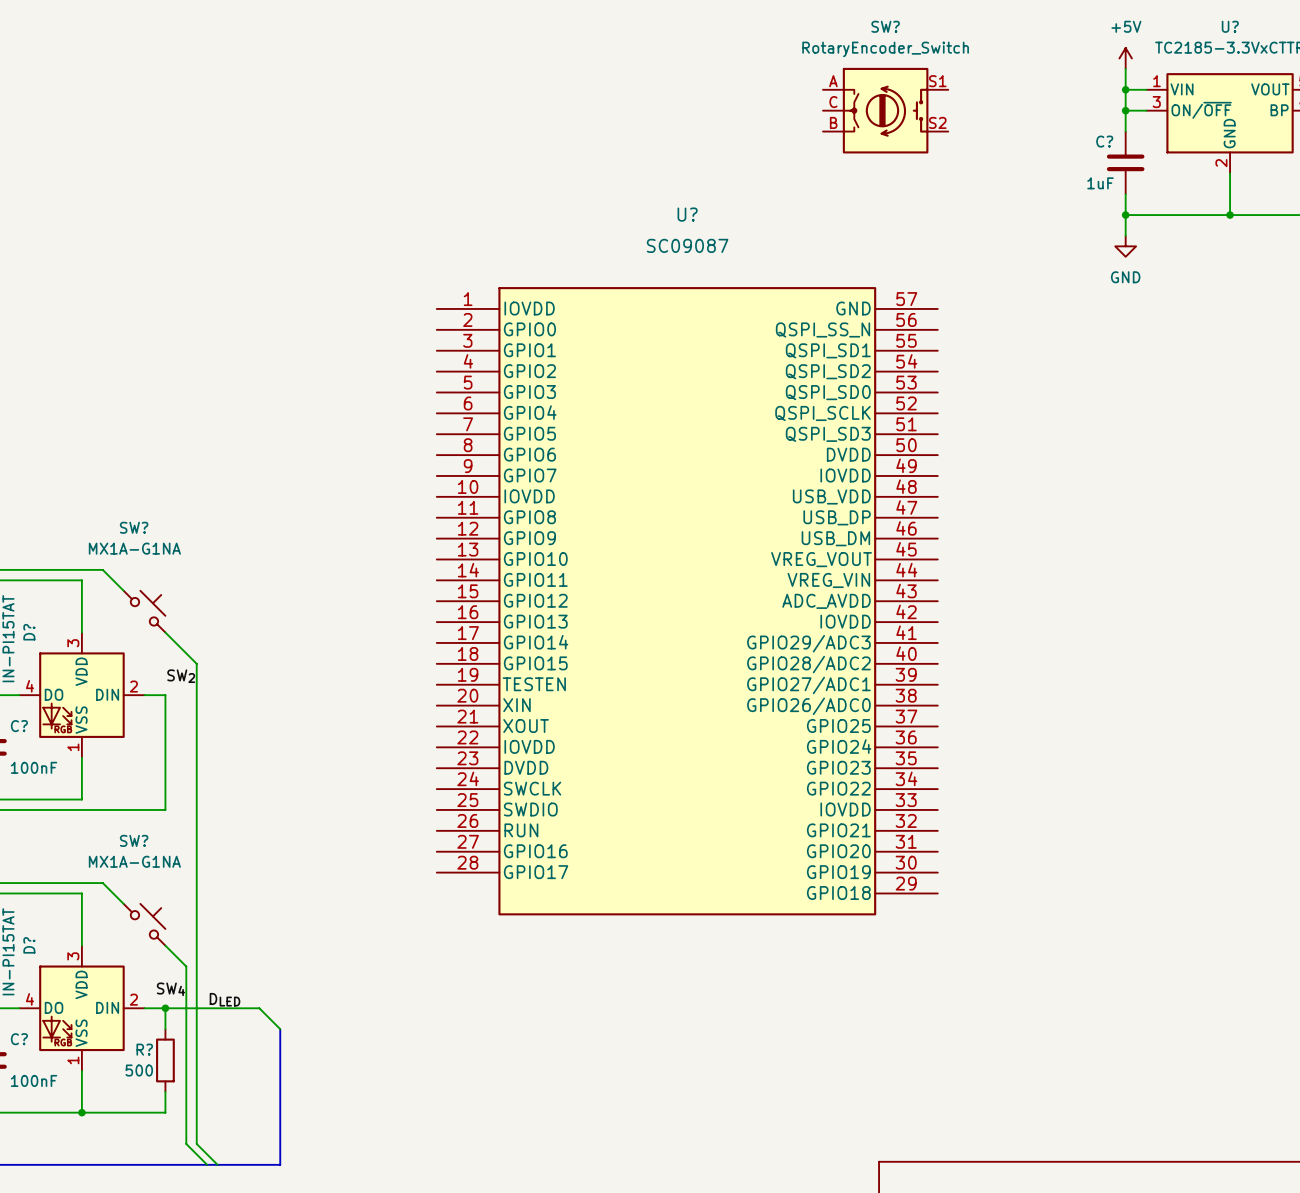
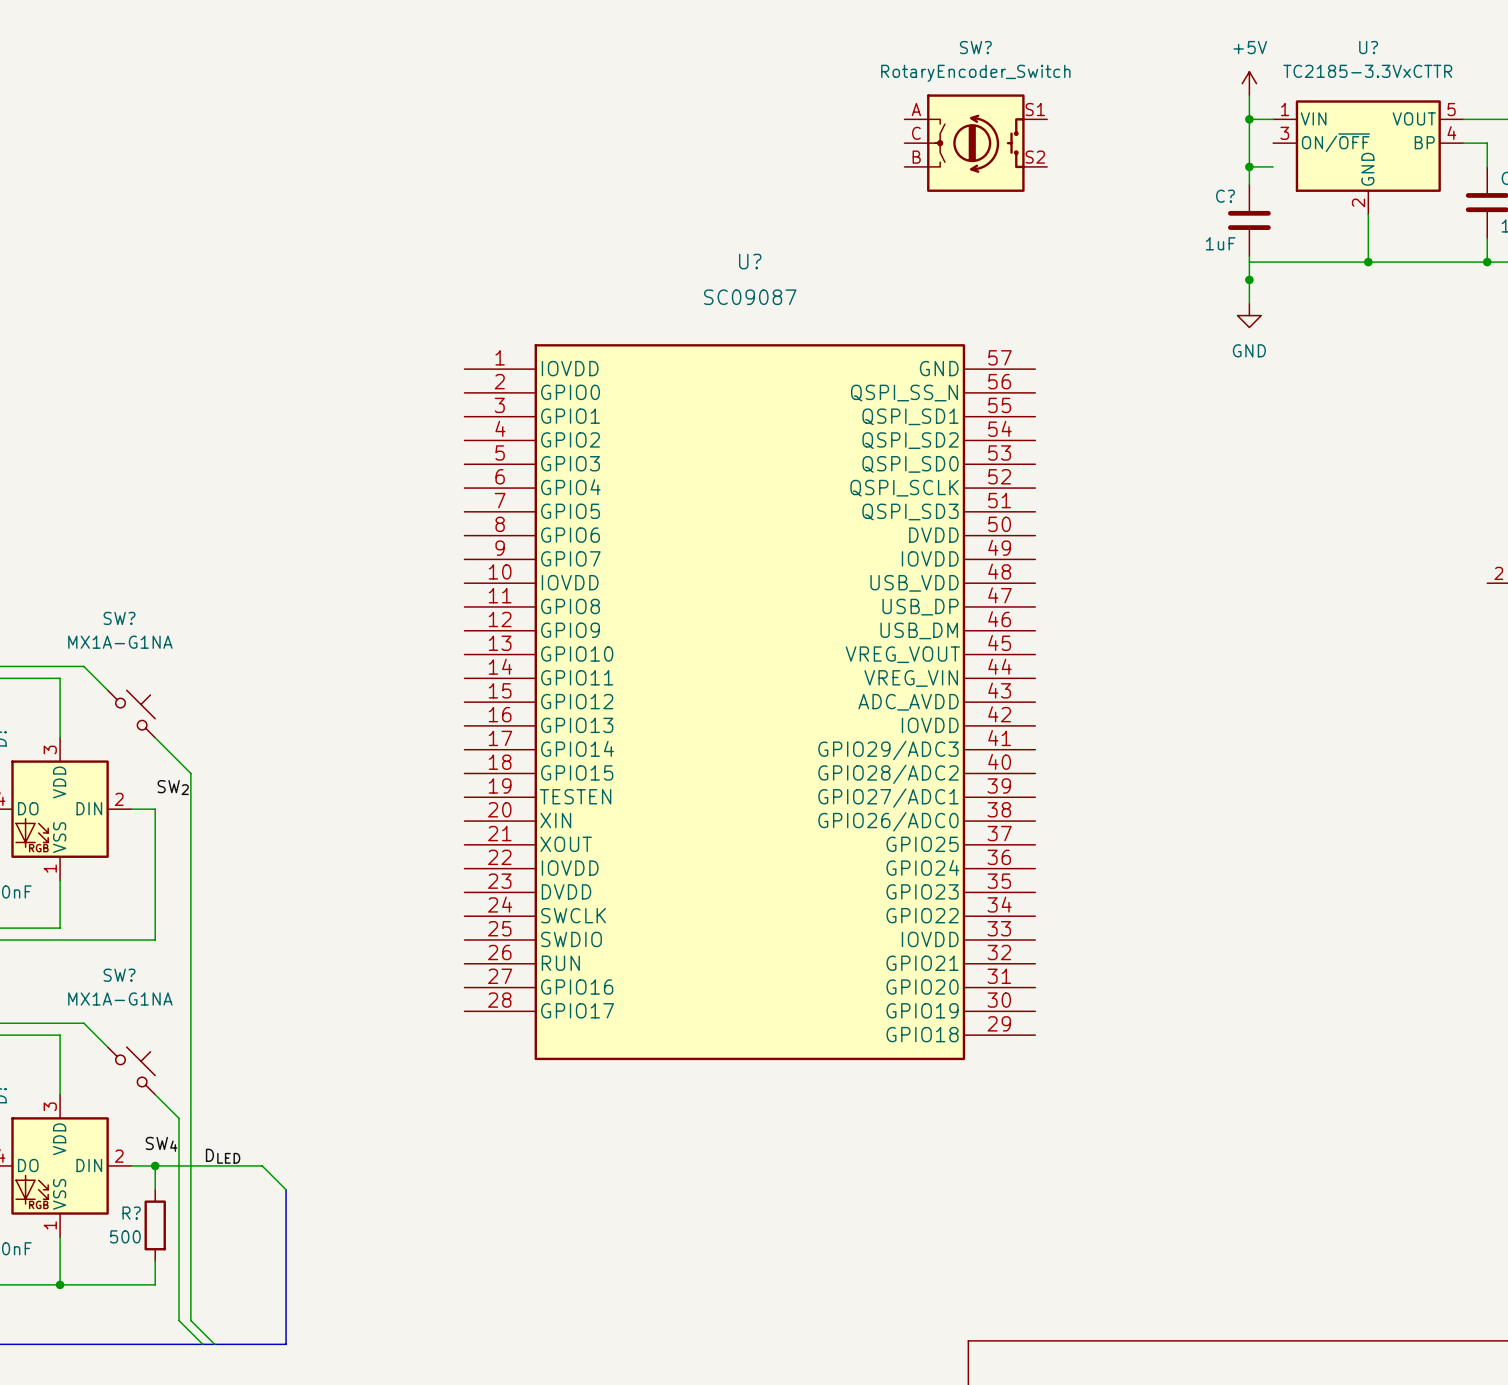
wire: (1125, 110) (1146, 110) -> none
junction position: (1125, 110) -> (1249, 166)
wire: none -> (1273, 166) (1249, 166) (1249, 184)
C? position: (1125, 162) -> (1249, 220)
junction position: (1125, 215) -> (1249, 279)
power symbol position: GND (1125, 246) -> GND (1249, 315)

